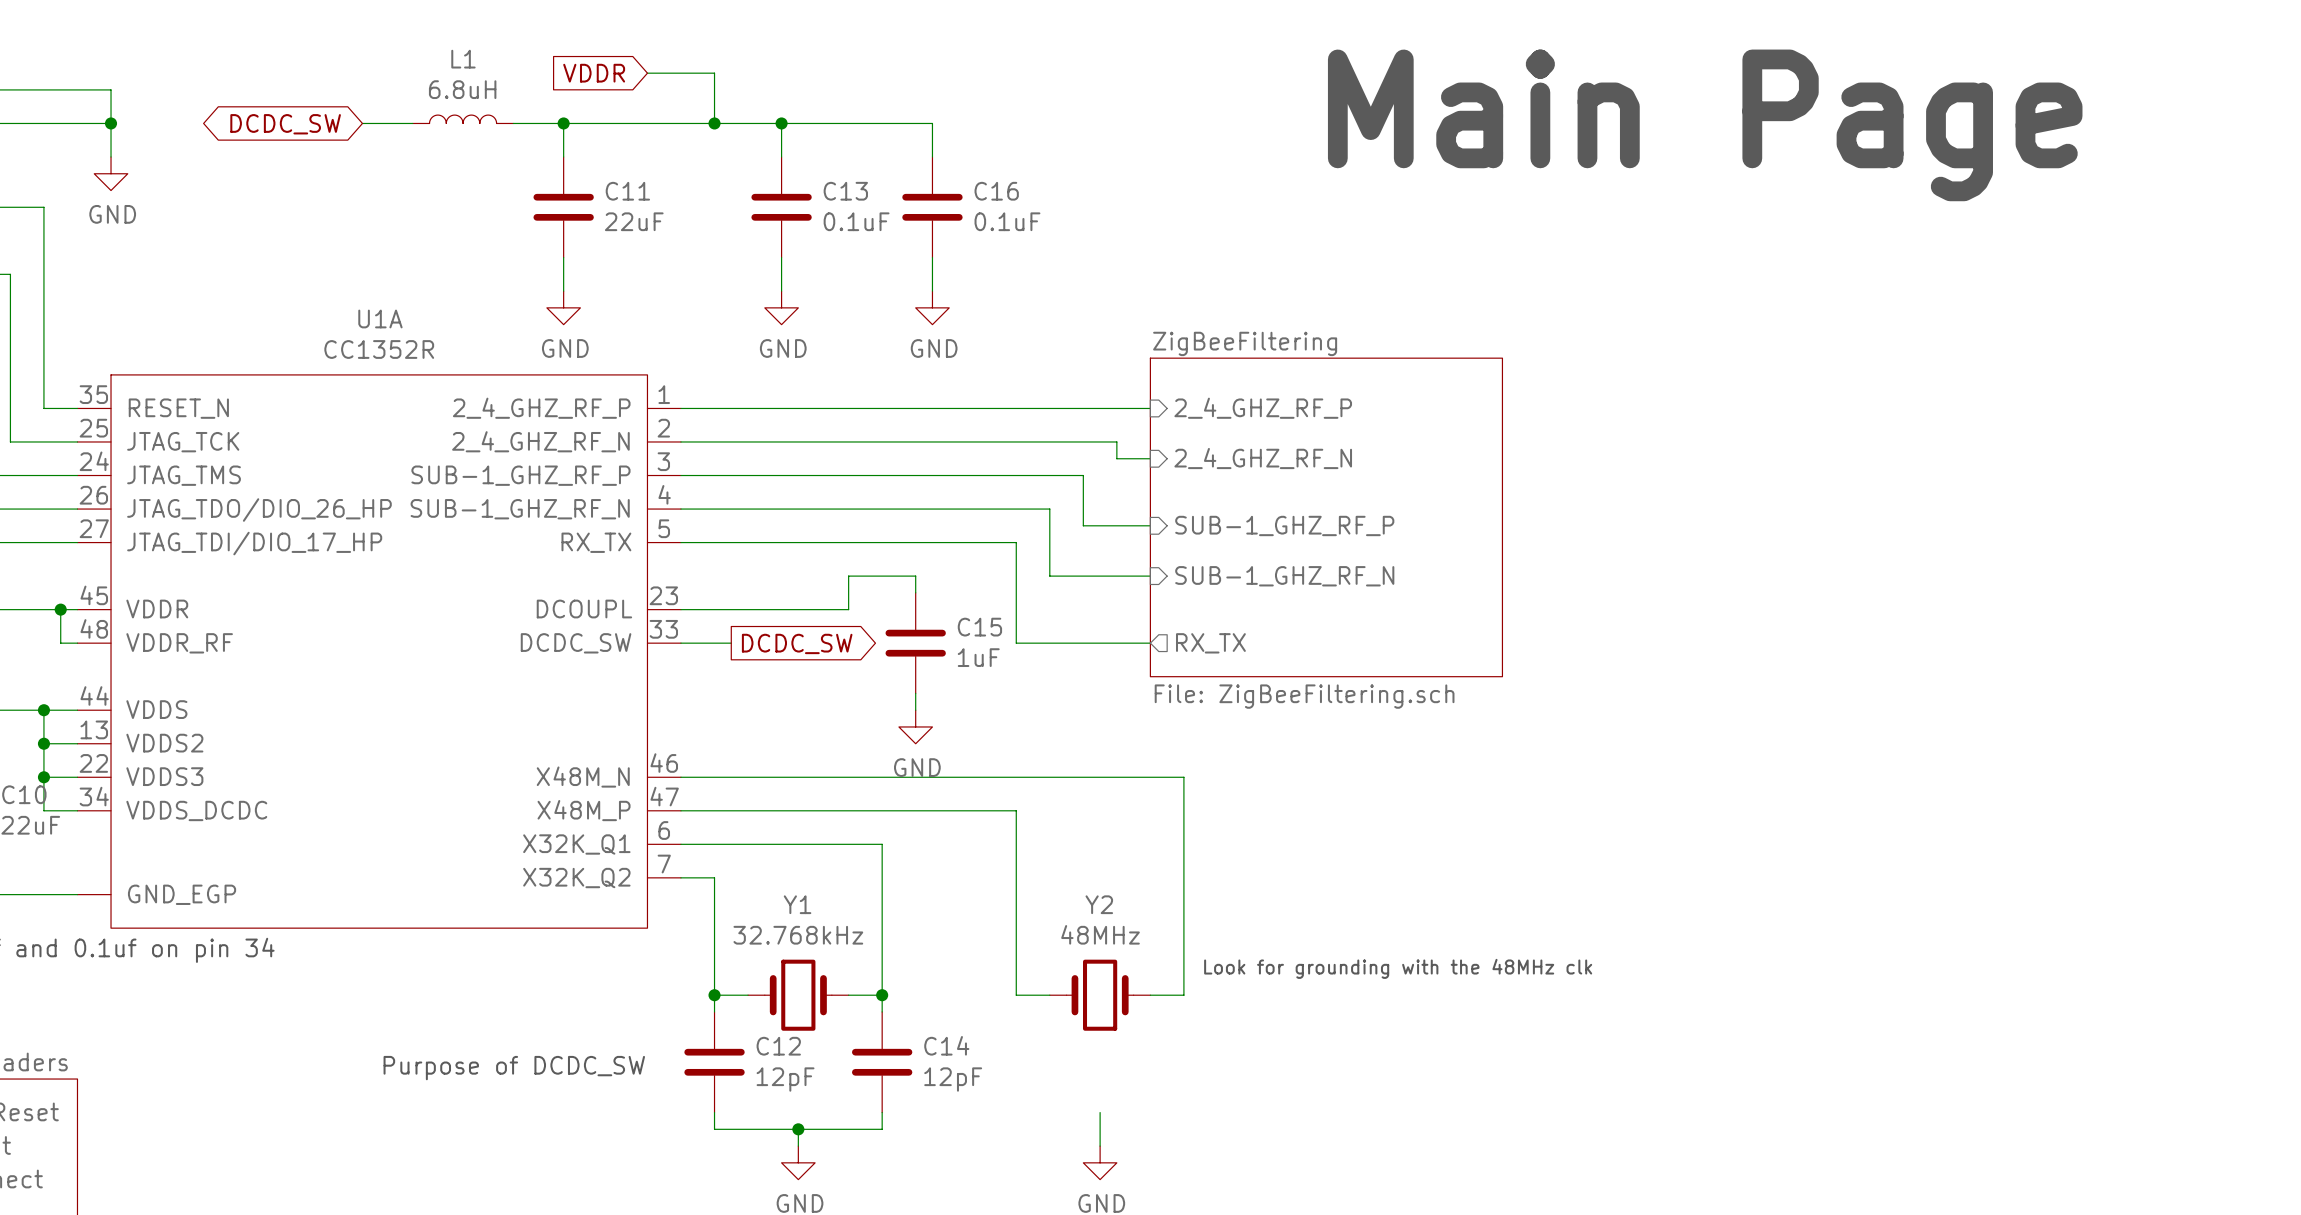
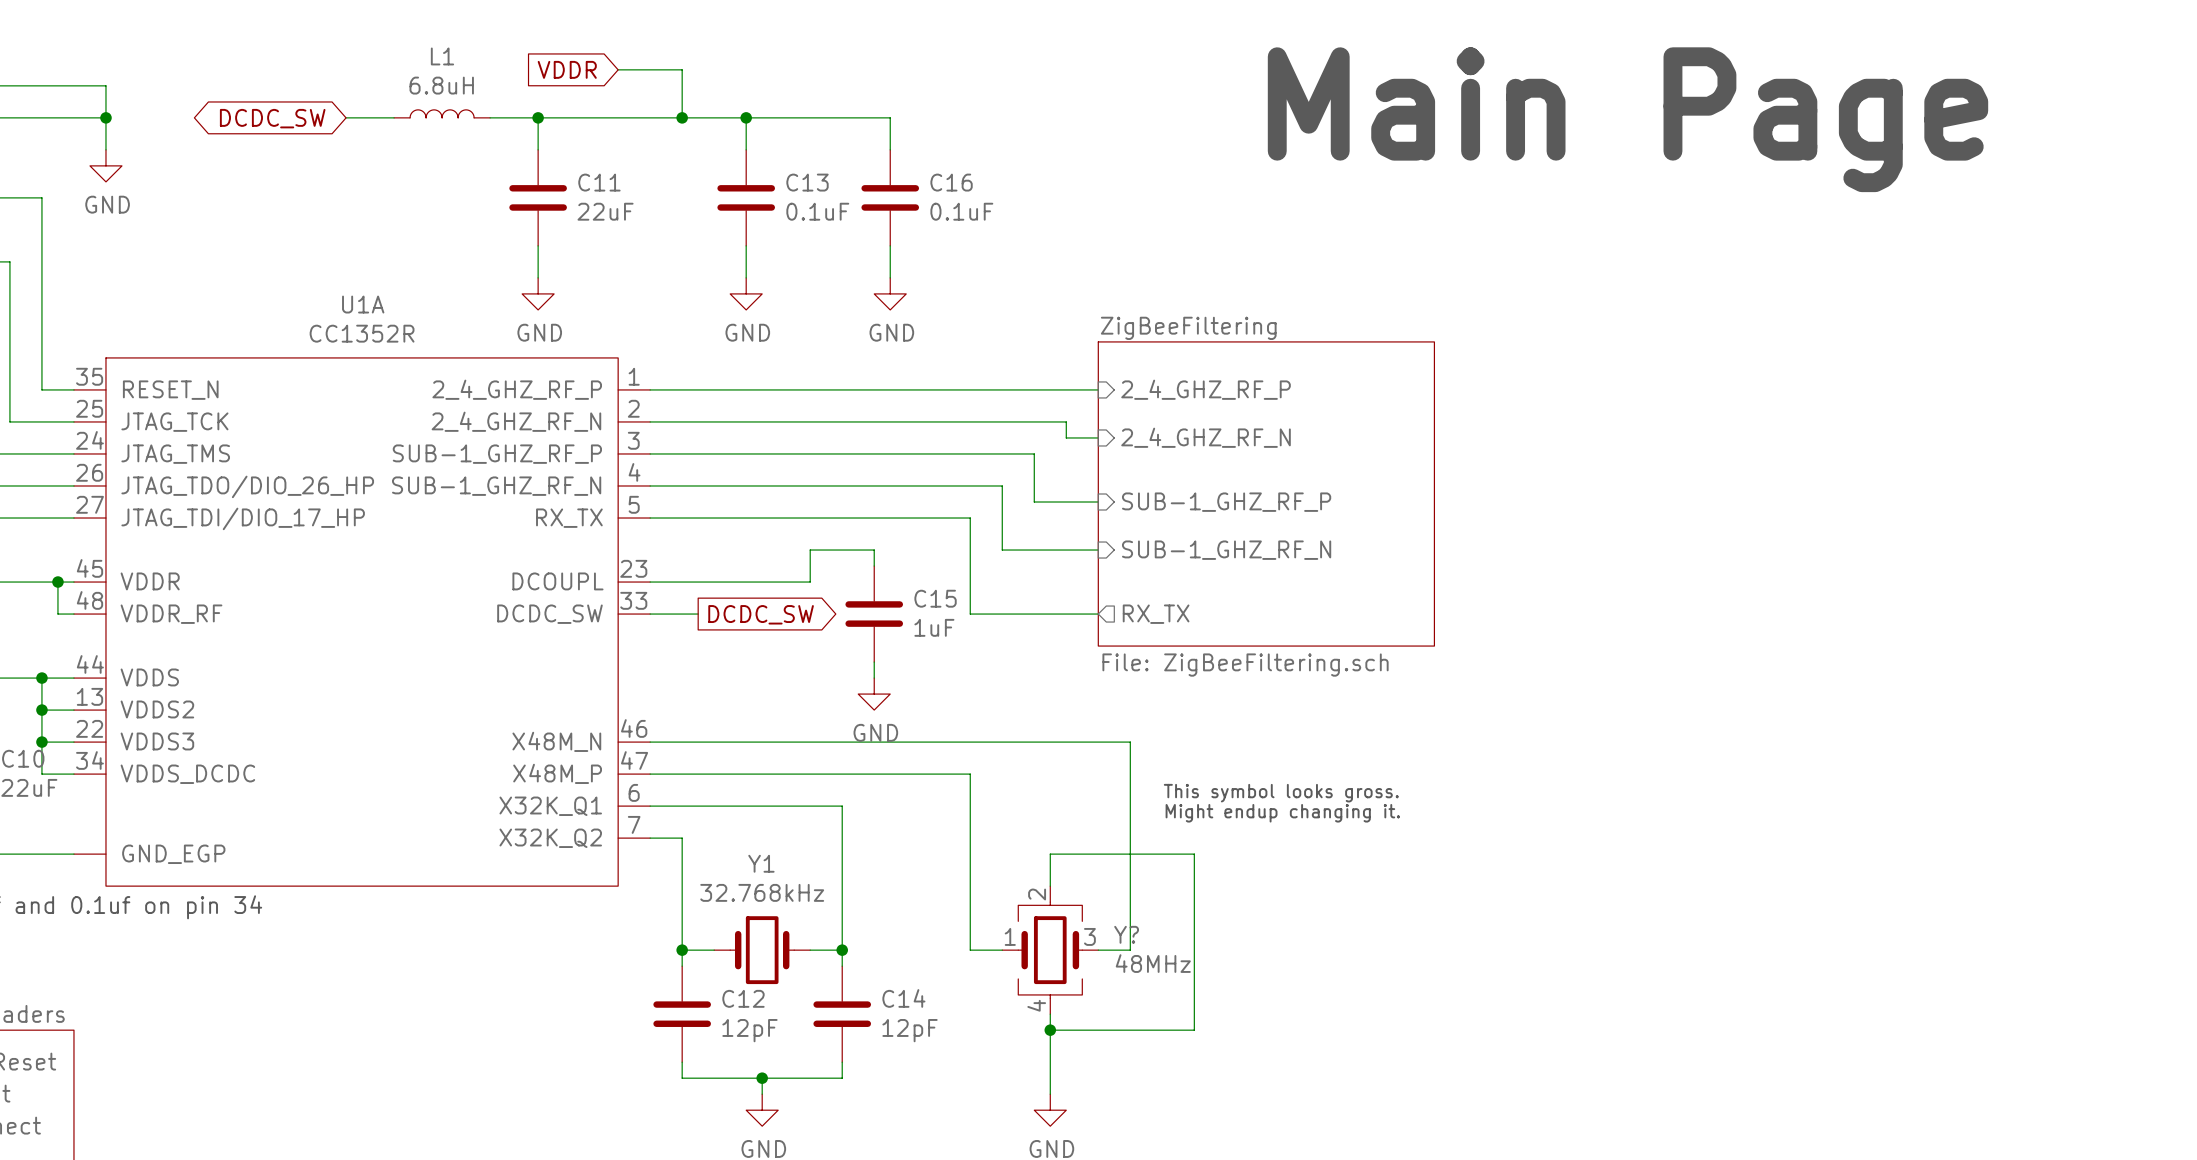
text: none -> This symbol looks gross. (1281, 793)
text: none -> Might endup changing it. (1282, 813)
wire: none -> (1050, 886) (1050, 854) (1194, 854) (1194, 1030) (1050, 1030)
text: Look for grounding with the 48MHz clk (1398, 968) -> none
Y2: 48MHz (1100, 995) -> none
Y?: none -> 48MHz (1050, 950)
wire: none -> (1050, 1014) (1050, 1062)
text: Purpose of DCDC_SW (514, 1068) -> none
junction: none -> (1050, 1030)

